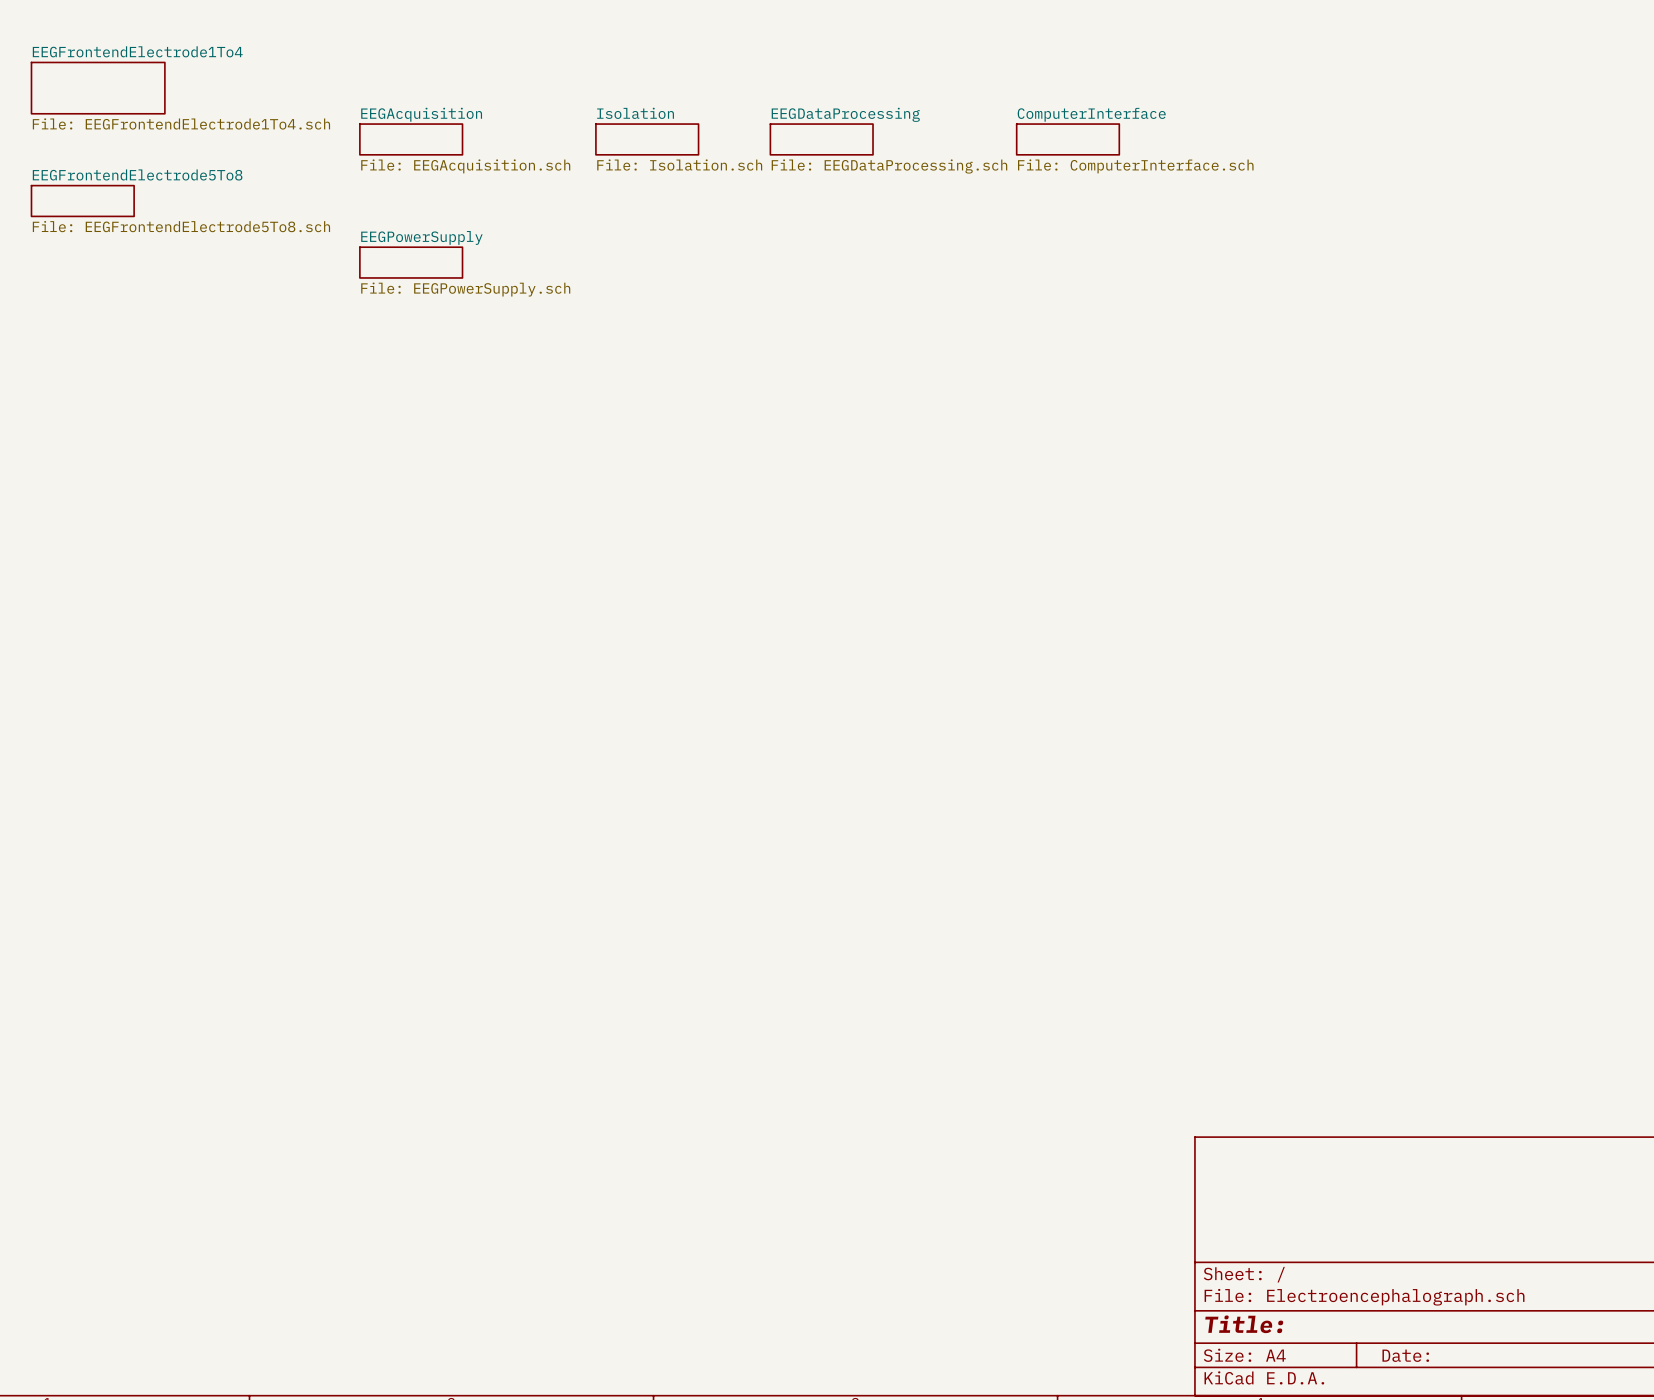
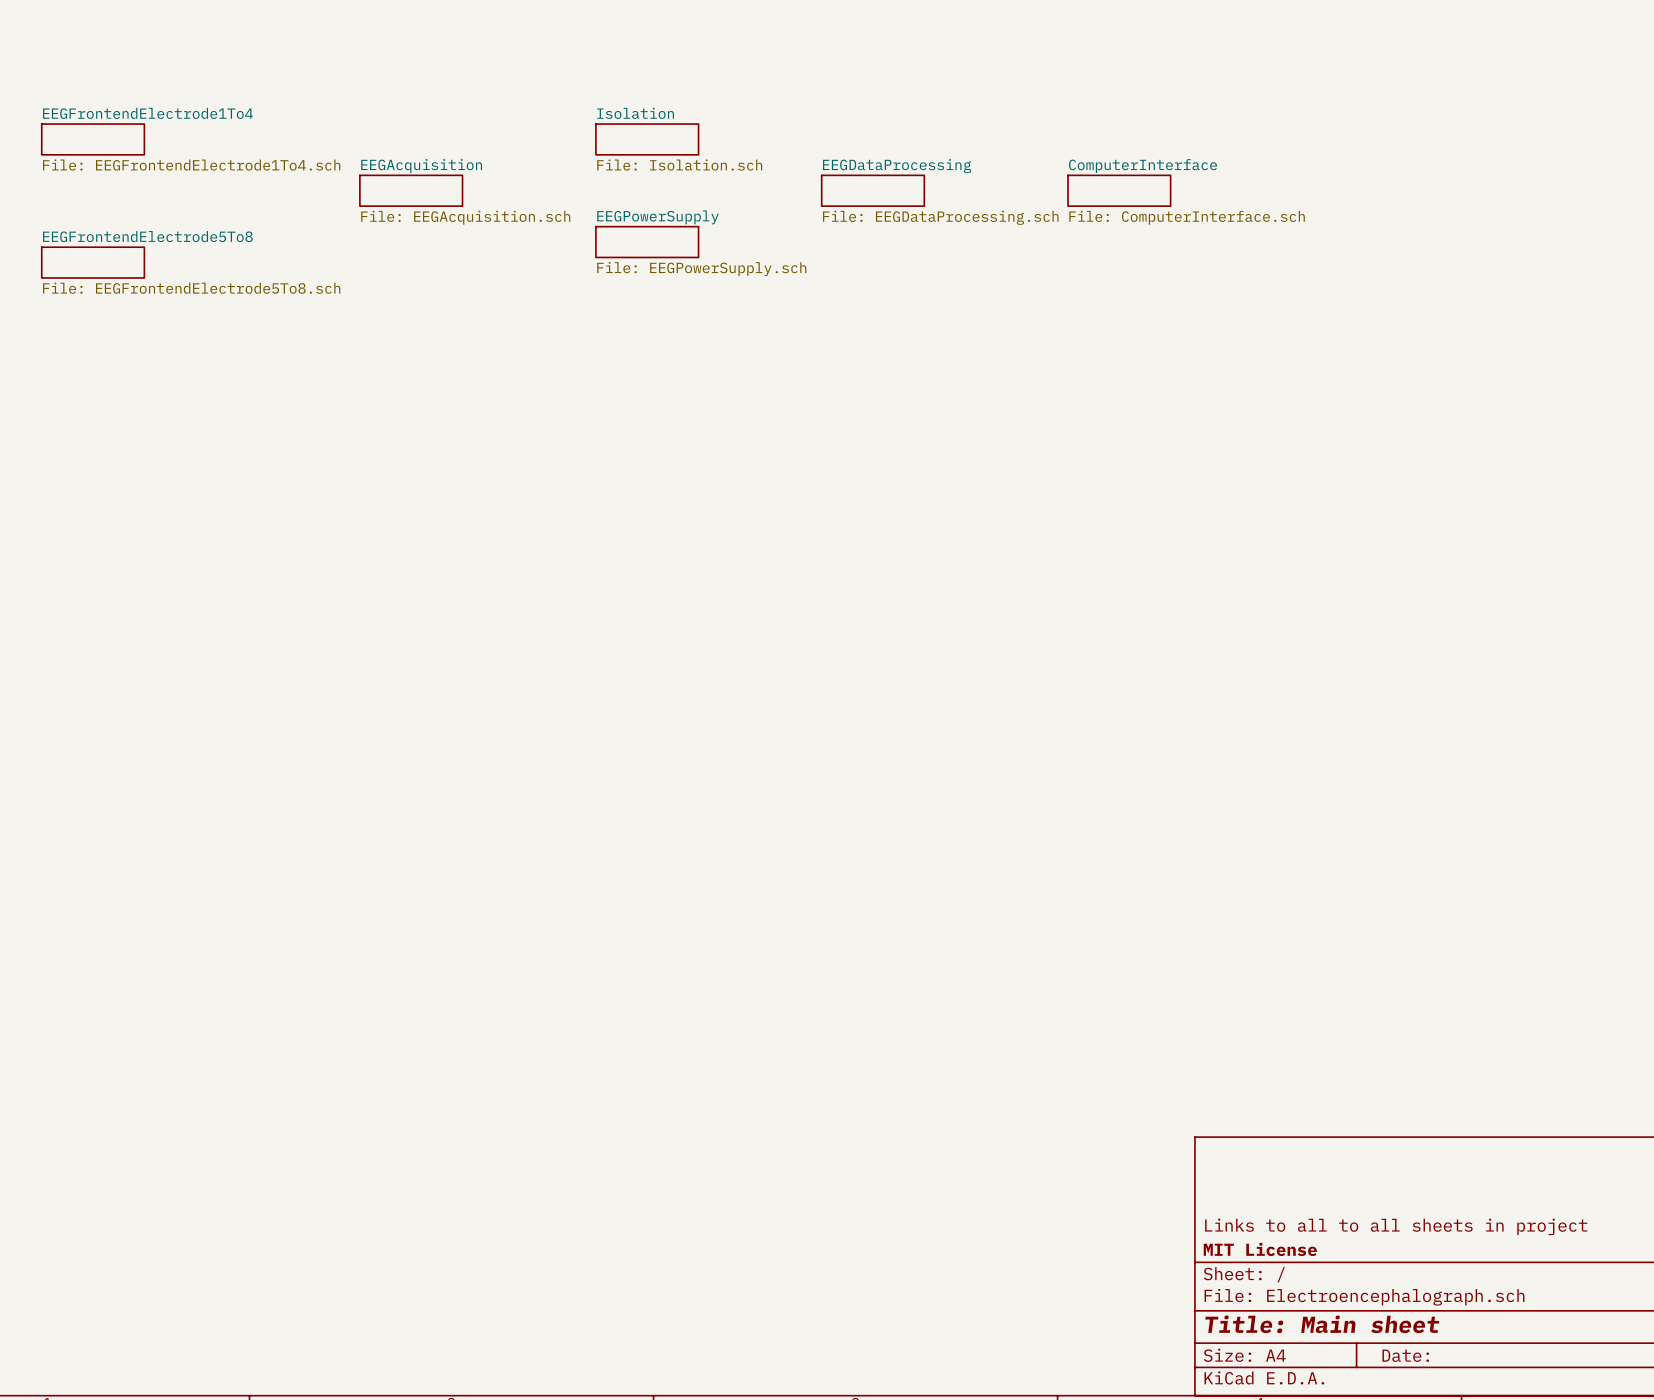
sheet EEGFrontendElectrode1To4 name position: EEGFrontendElectrode1To4 (137, 51) -> EEGFrontendElectrode1To4 (147, 113)
sheet EEGFrontendElectrode1To4 shape: [31, 62, 165, 114] -> [41, 124, 145, 155]
sheet EEGFrontendElectrode1To4 value position: File: EEGFrontendElectrode1To4.sch (181, 123) -> File: EEGFrontendElectrode1To4.sch (191, 165)
sheet EEGAcquisition position: (411, 139) -> (411, 190)
sheet EEGDataProcessing position: (821, 139) -> (873, 190)
sheet ComputerInterface position: (1068, 139) -> (1119, 190)
sheet EEGFrontendElectrode5To8 position: (82, 201) -> (93, 262)
sheet EEGPowerSupply: none -> File: EEGPowerSupply.sch (647, 242)
sheet EEGPowerSupply: File: EEGPowerSupply.sch (411, 262) -> none
title block: none -> Links to all to all sheets in project (1396, 1226)
title block: none -> MIT License (1260, 1249)
title block: Title: (1244, 1324) -> Title: Main sheet (1322, 1324)

